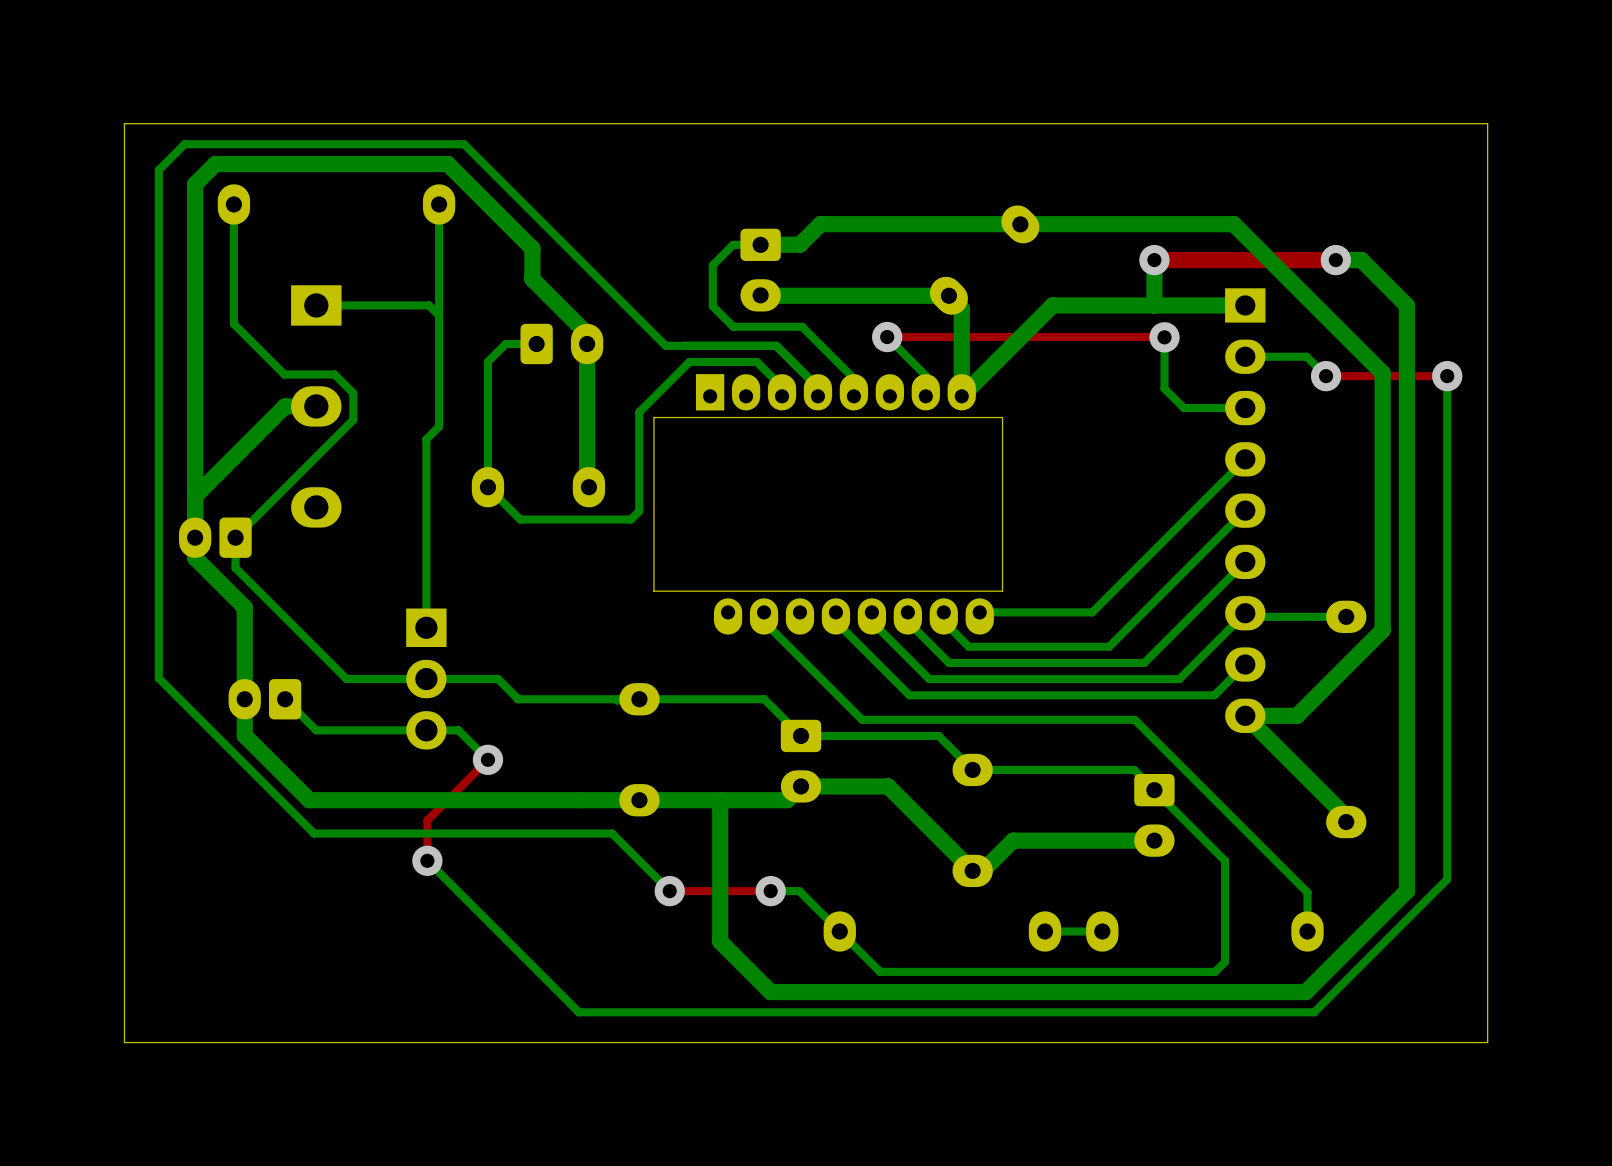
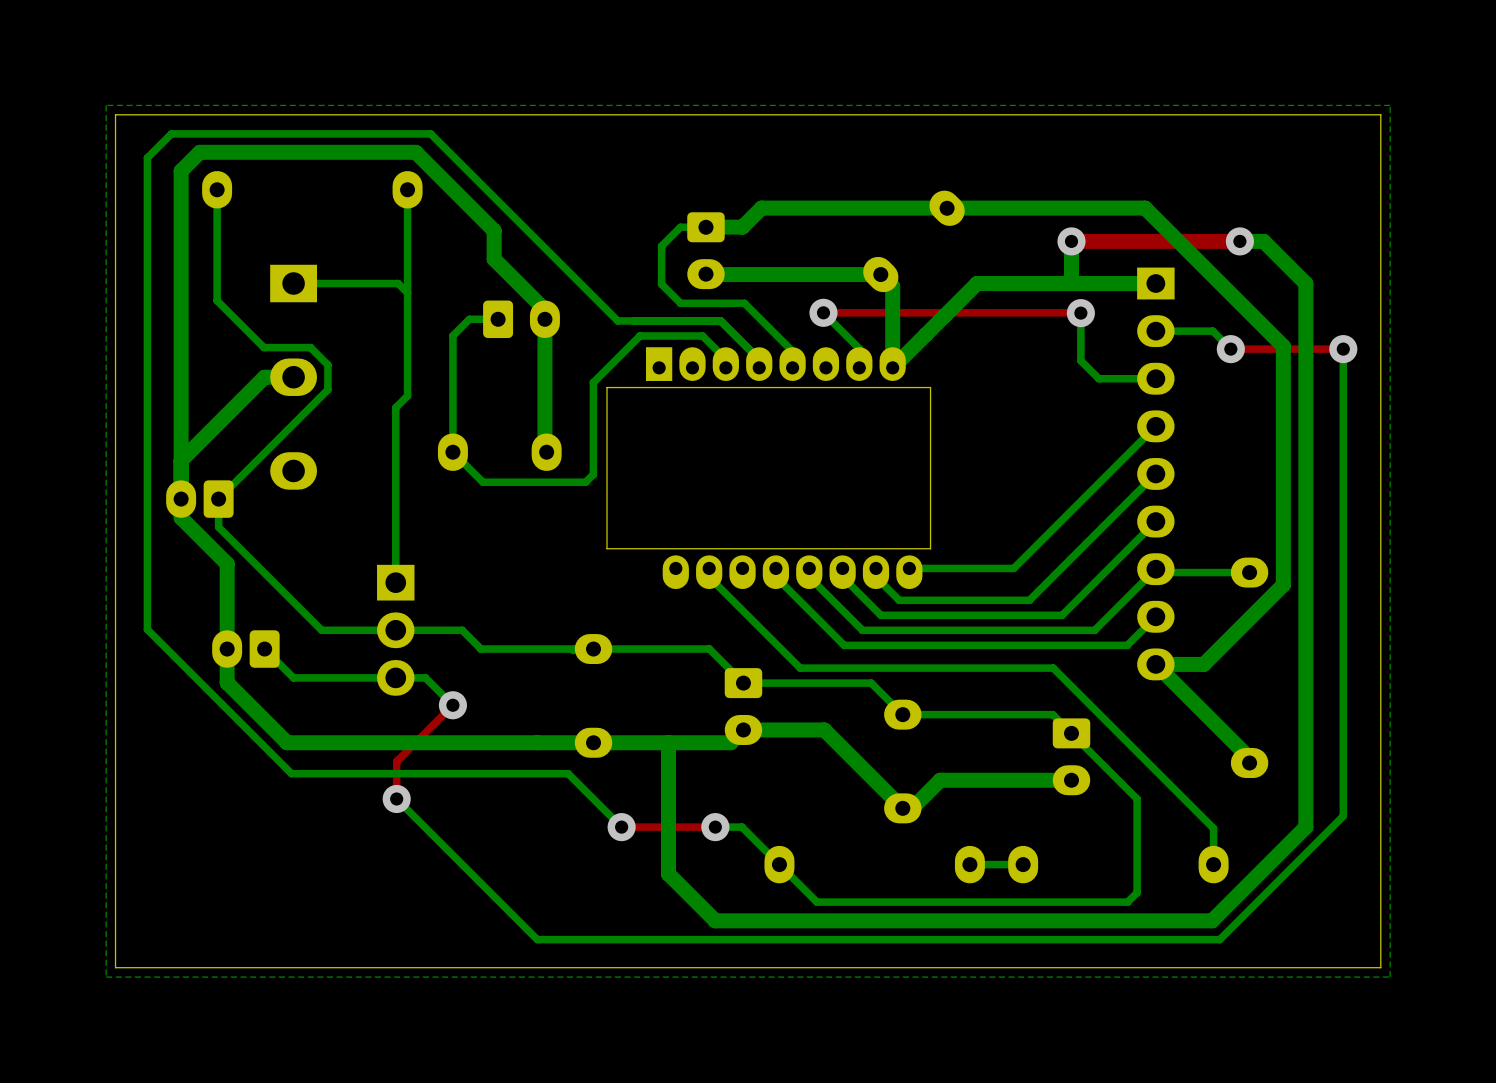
bottom zone outline: none -> (1390, 105) (106, 105) (106, 977) (1390, 977) (1390, 105)

